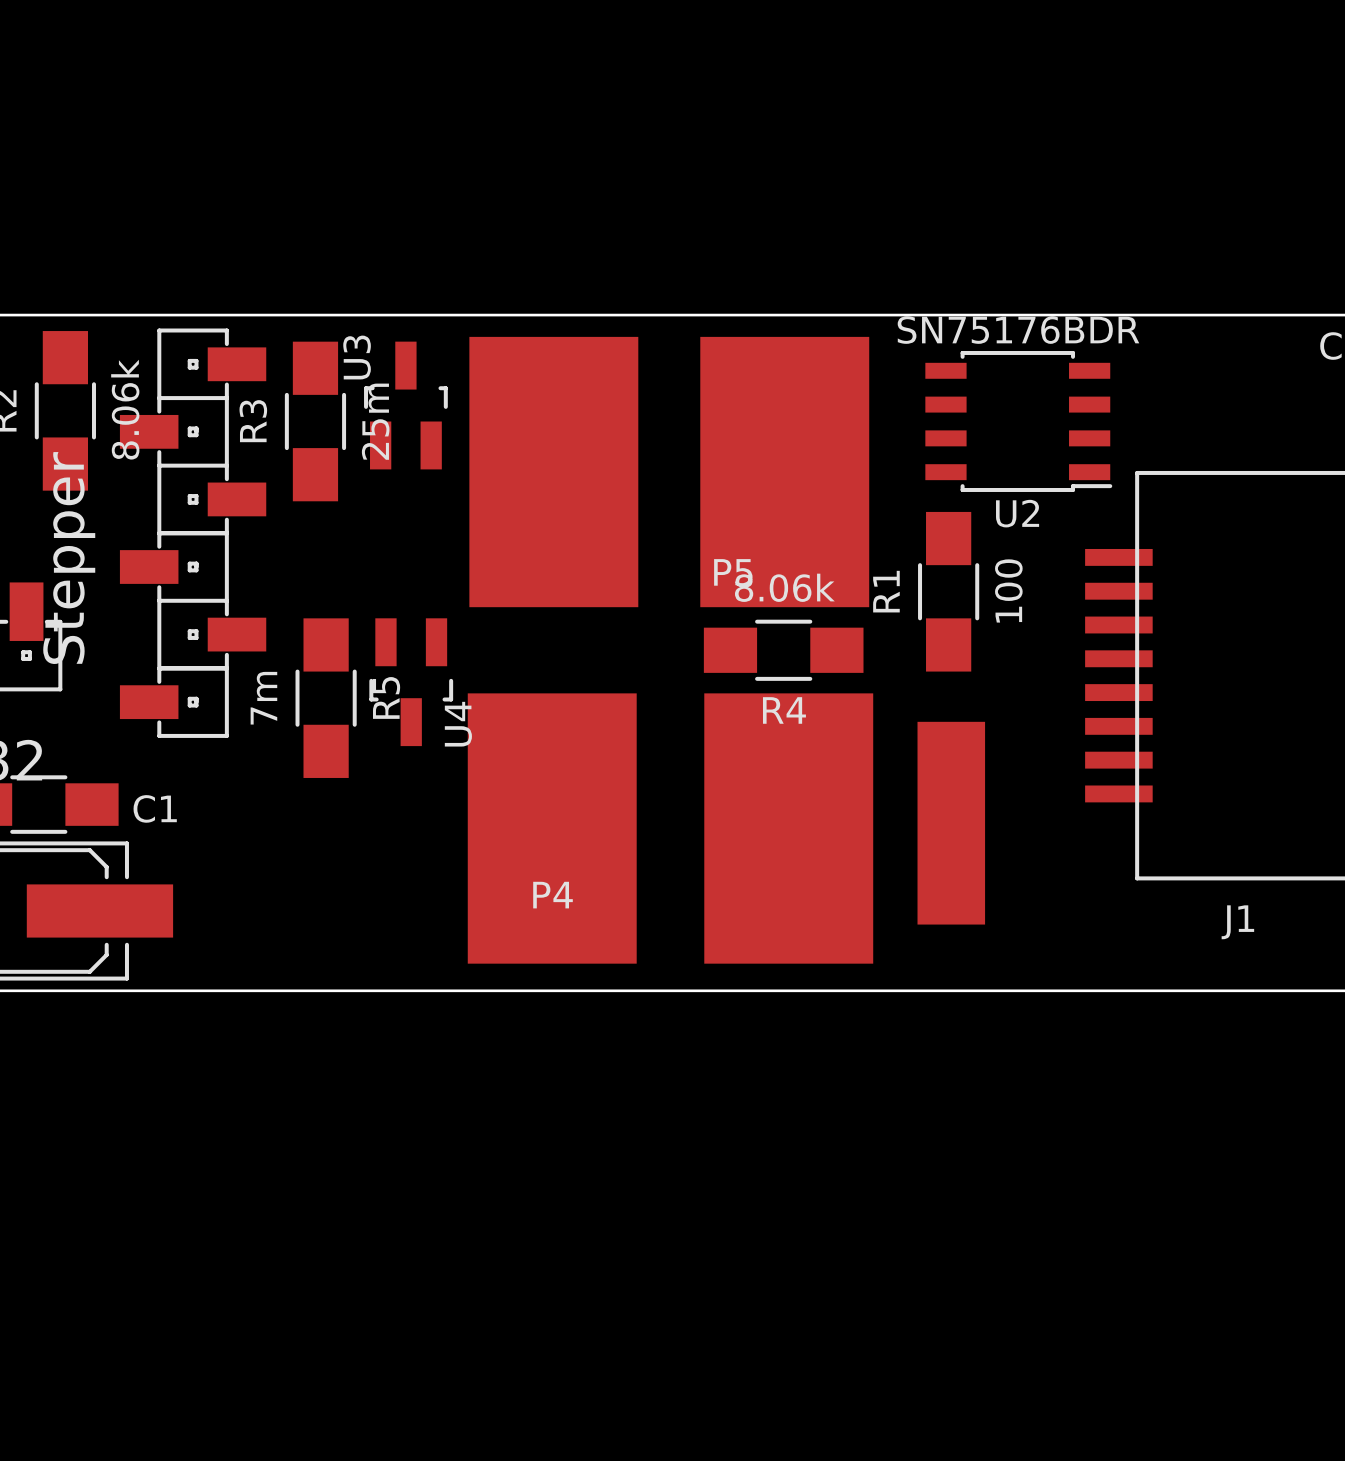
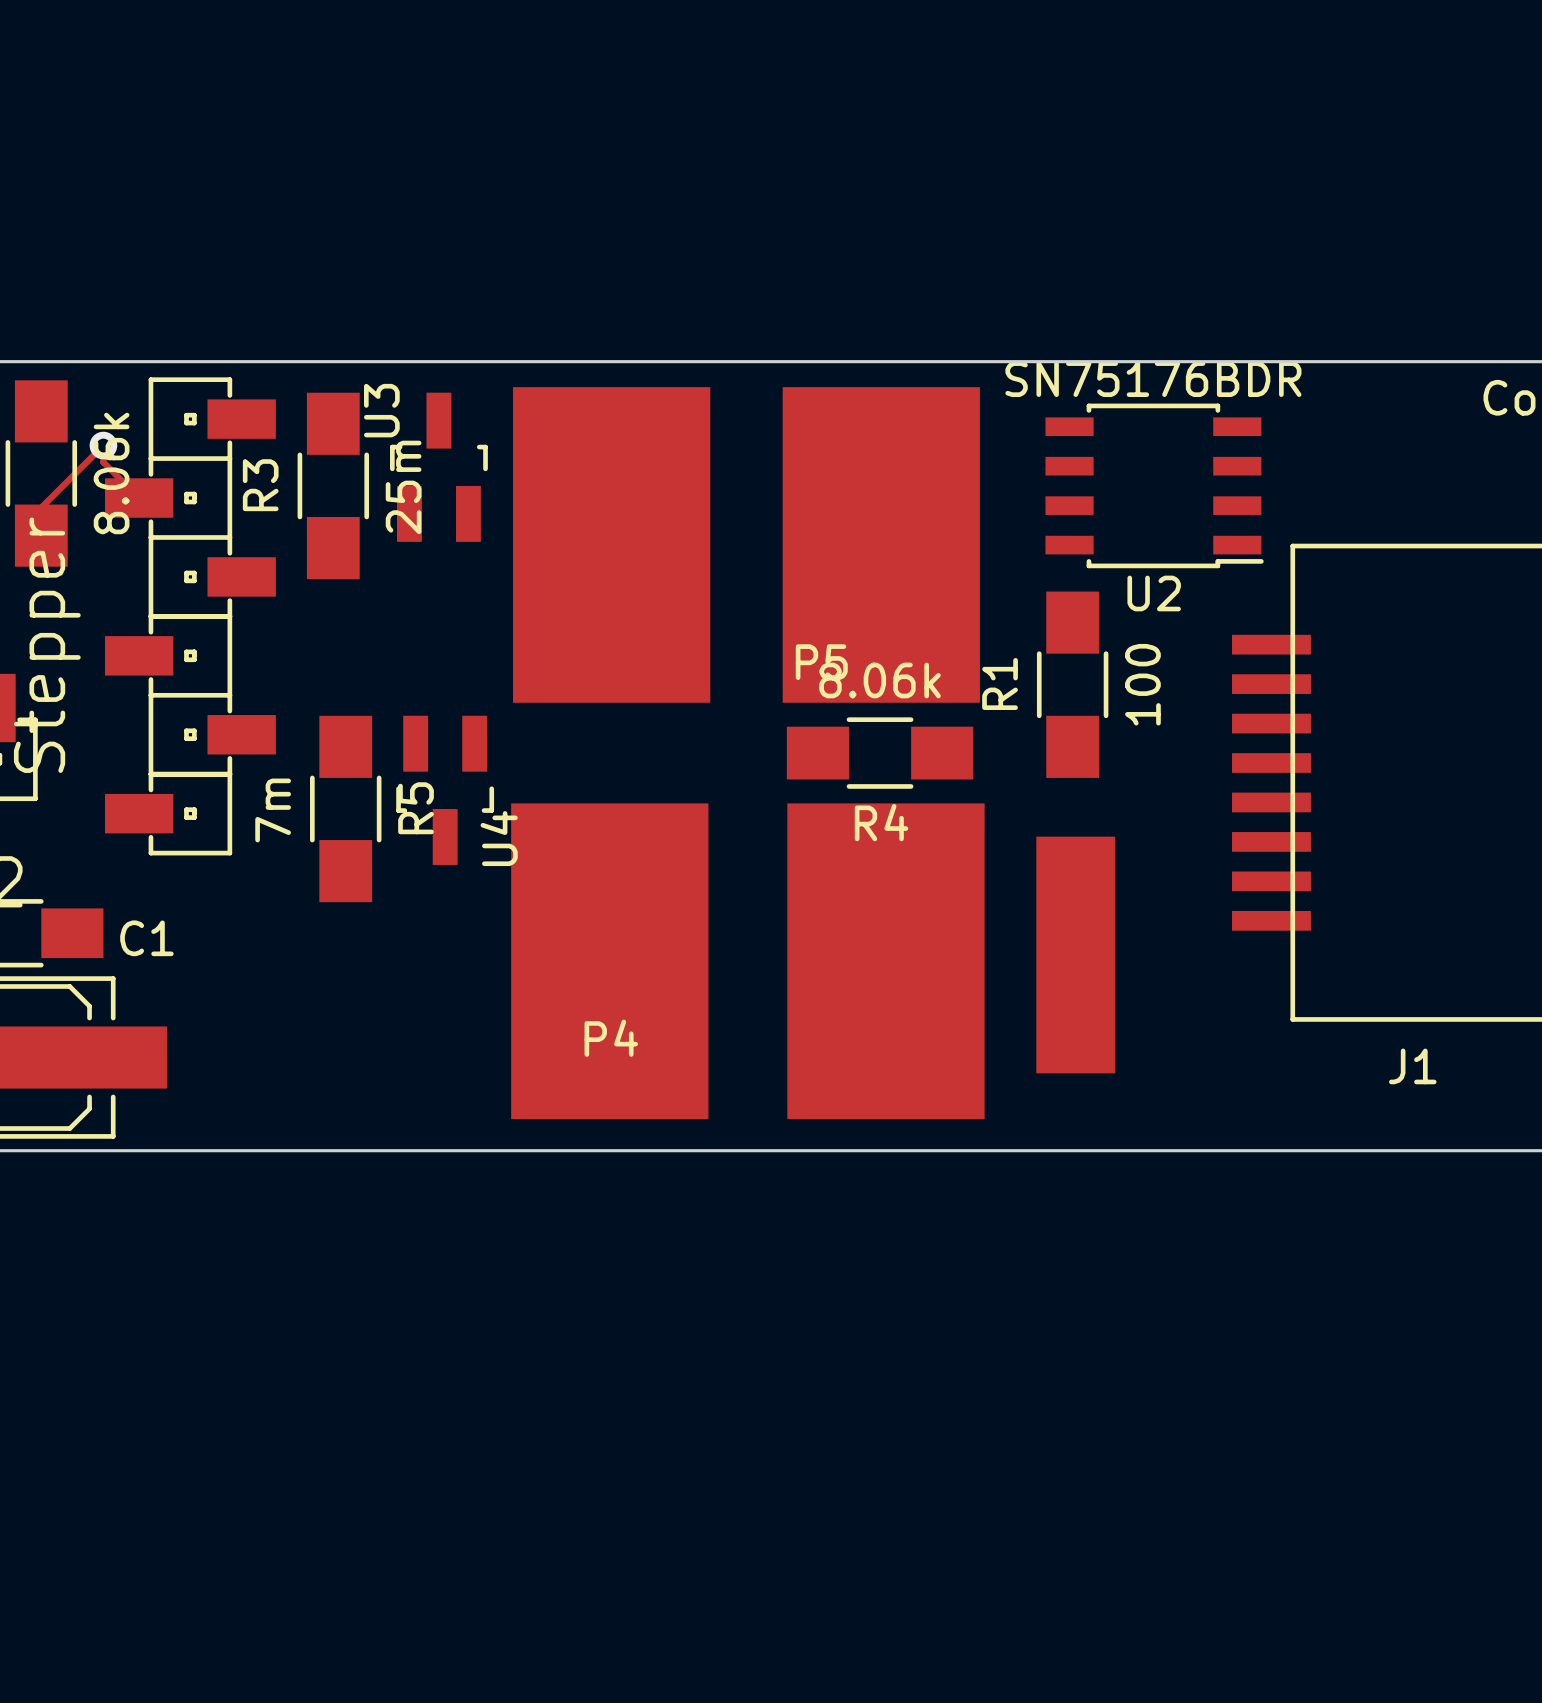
via: none -> (103, 445)
track: none -> (139, 498) (103, 462) (103, 445) (41, 507) (41, 535)

